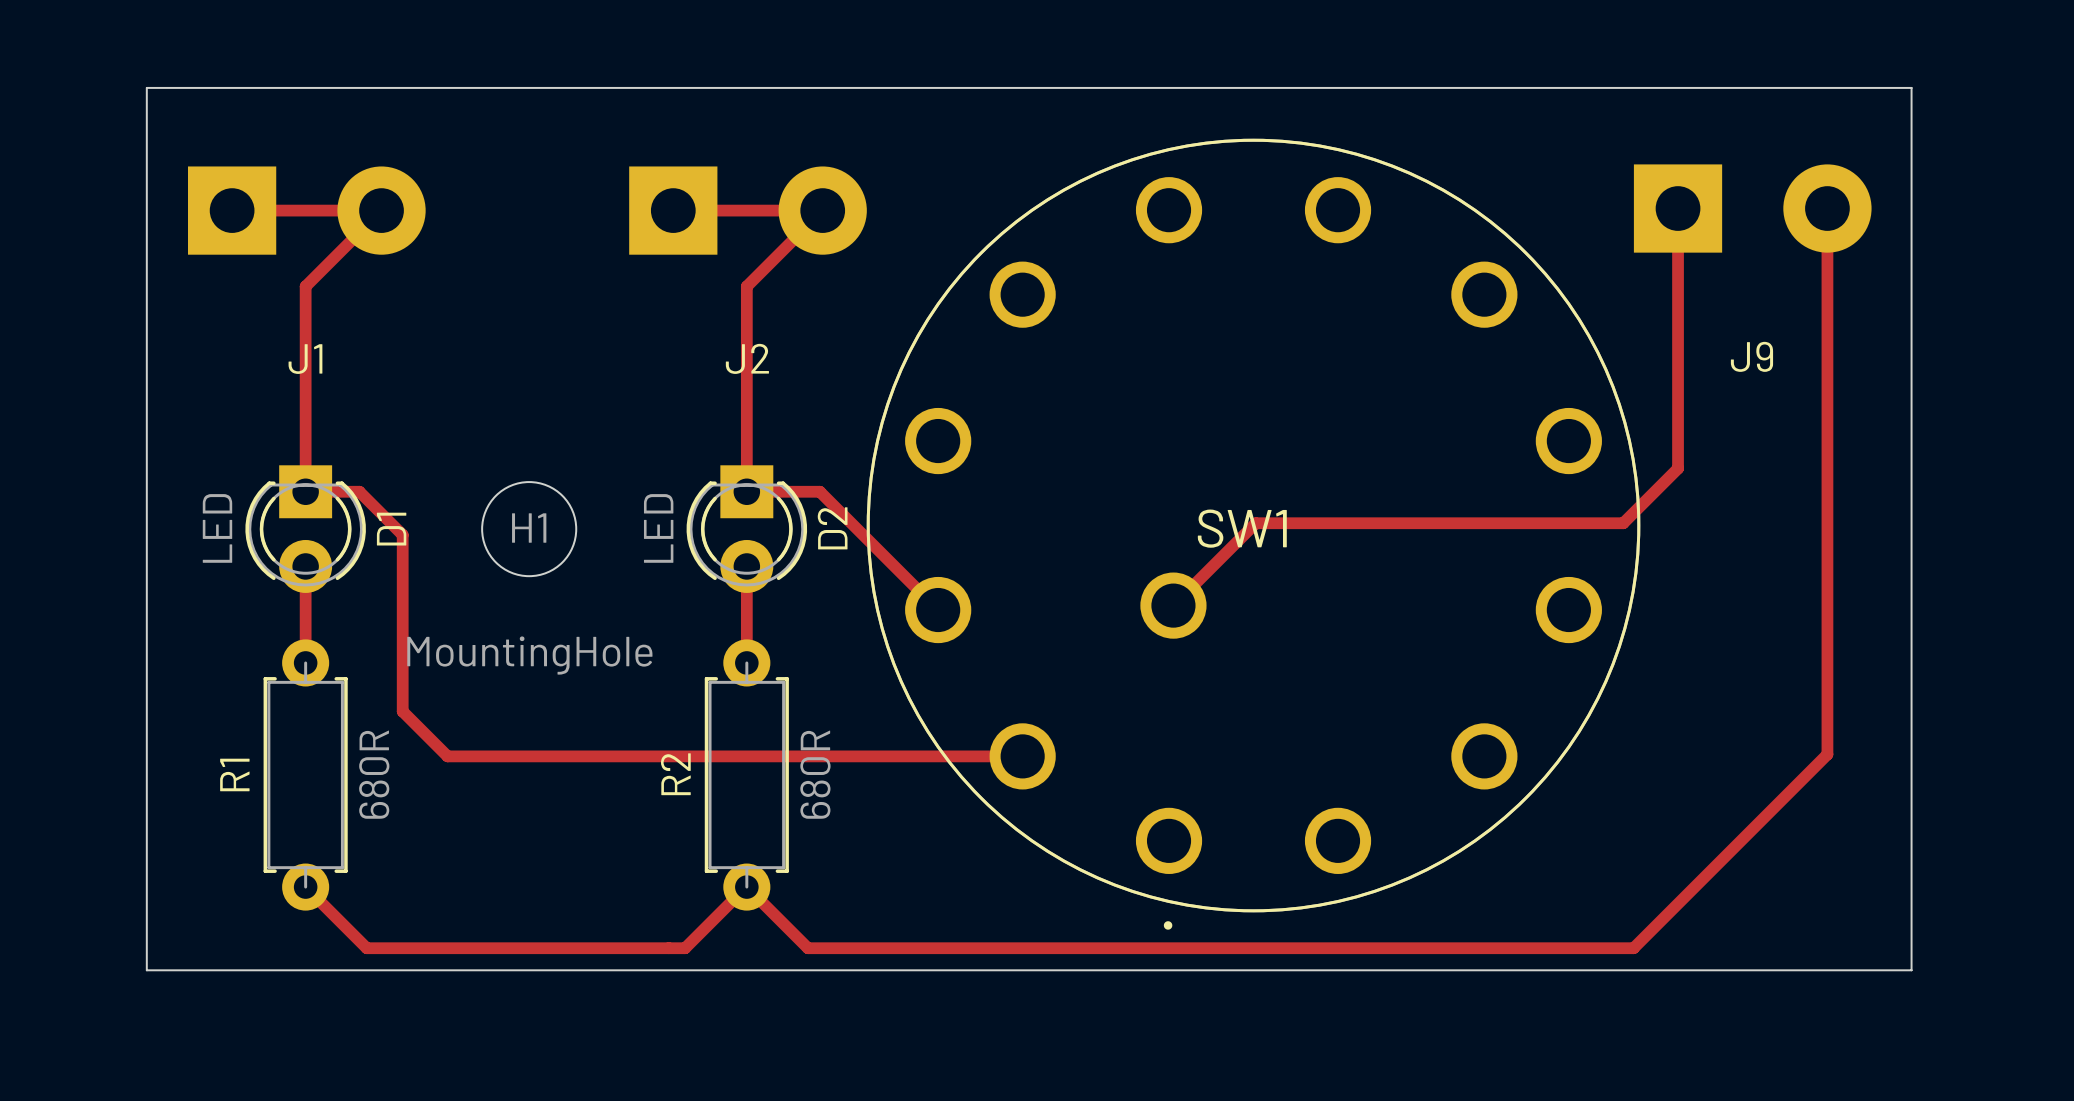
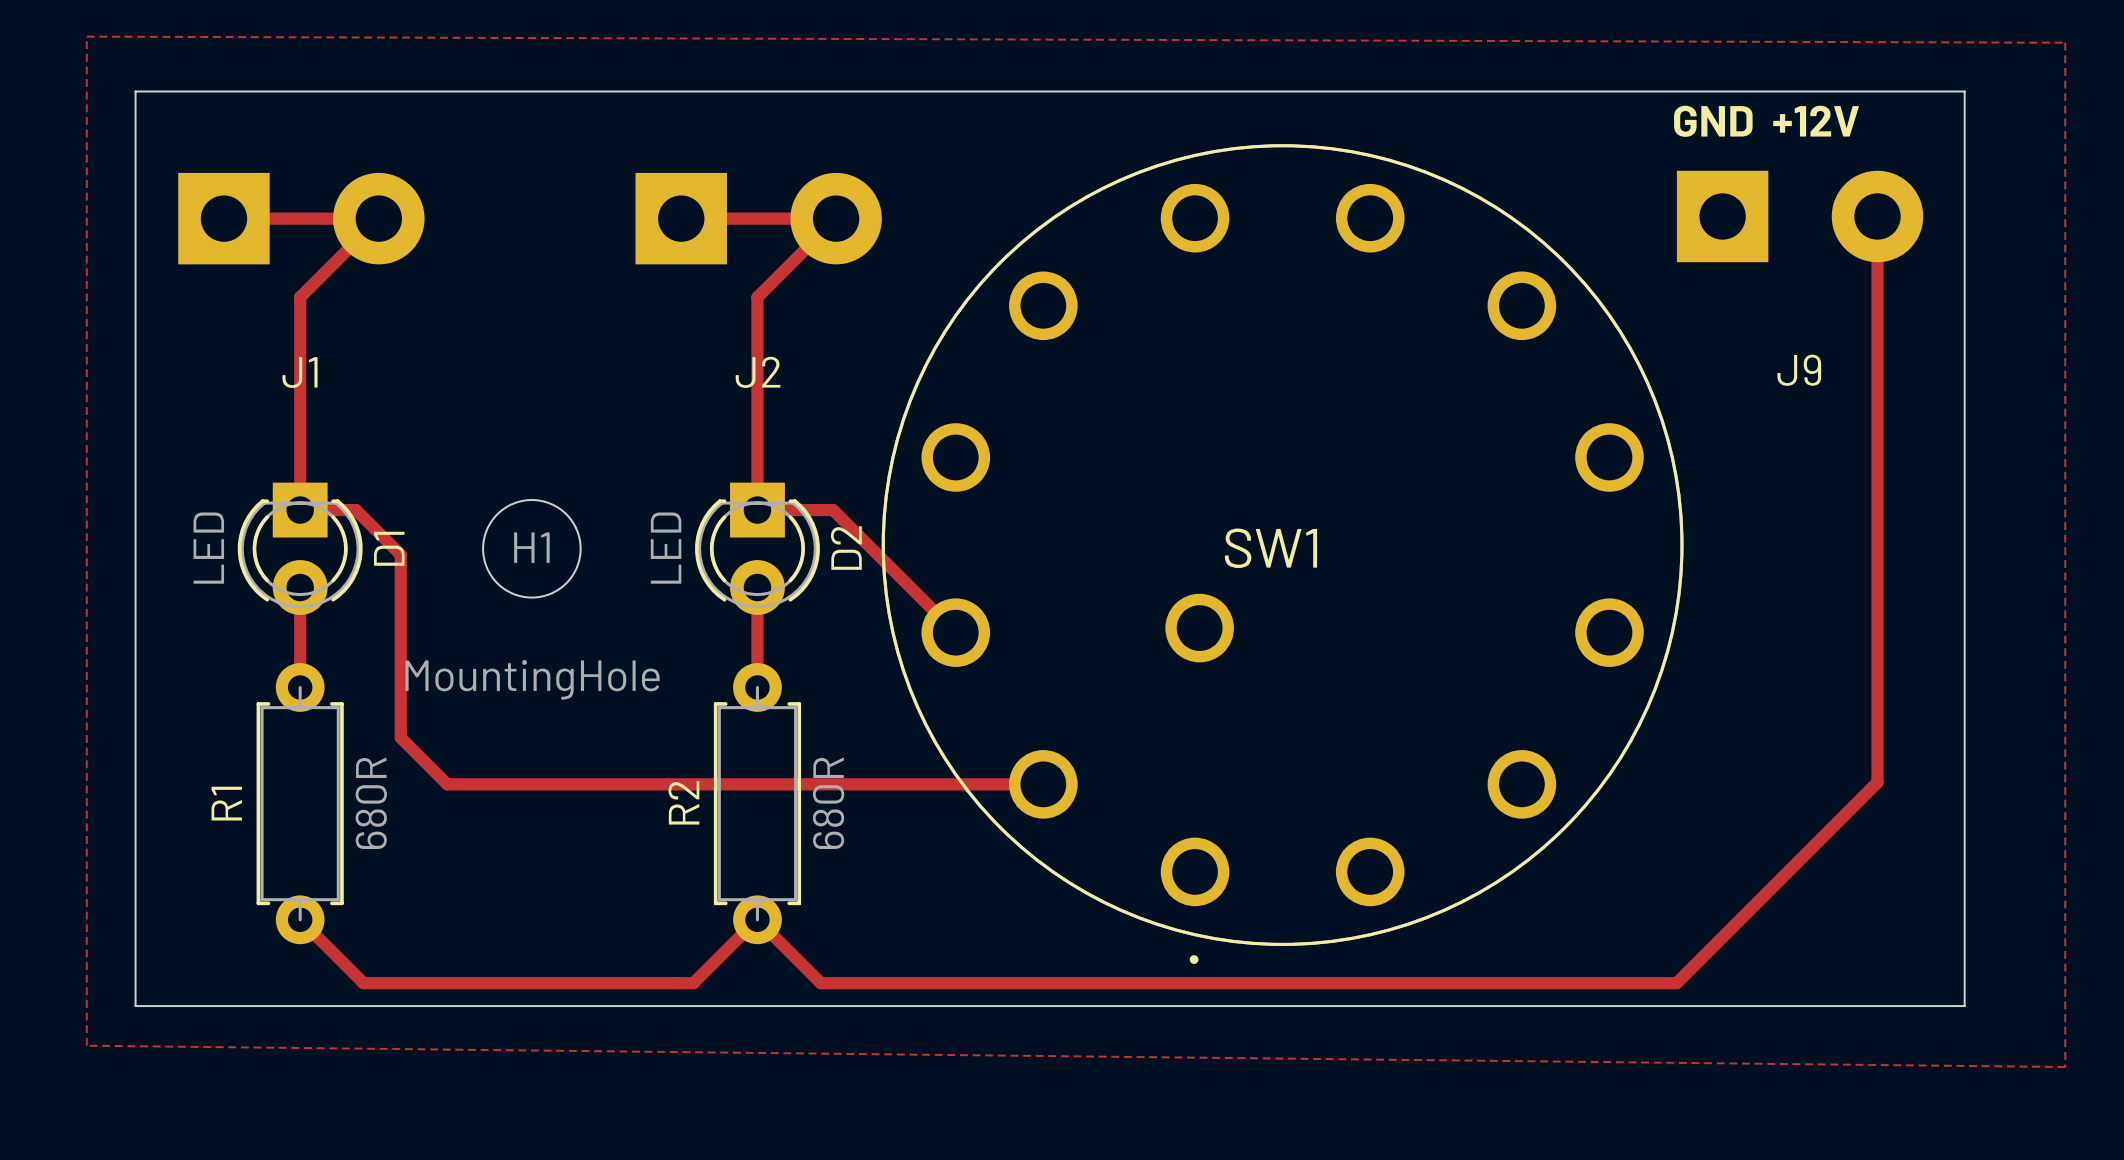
top zone outline: none -> (86, 36) (2065, 42) (2065, 1067) (86, 1045) (86, 36)
text: none -> GND +12V (1766, 121)
top track: (1678, 208) (1678, 468) (1623, 523) (1255, 523) (1173, 605) -> none

